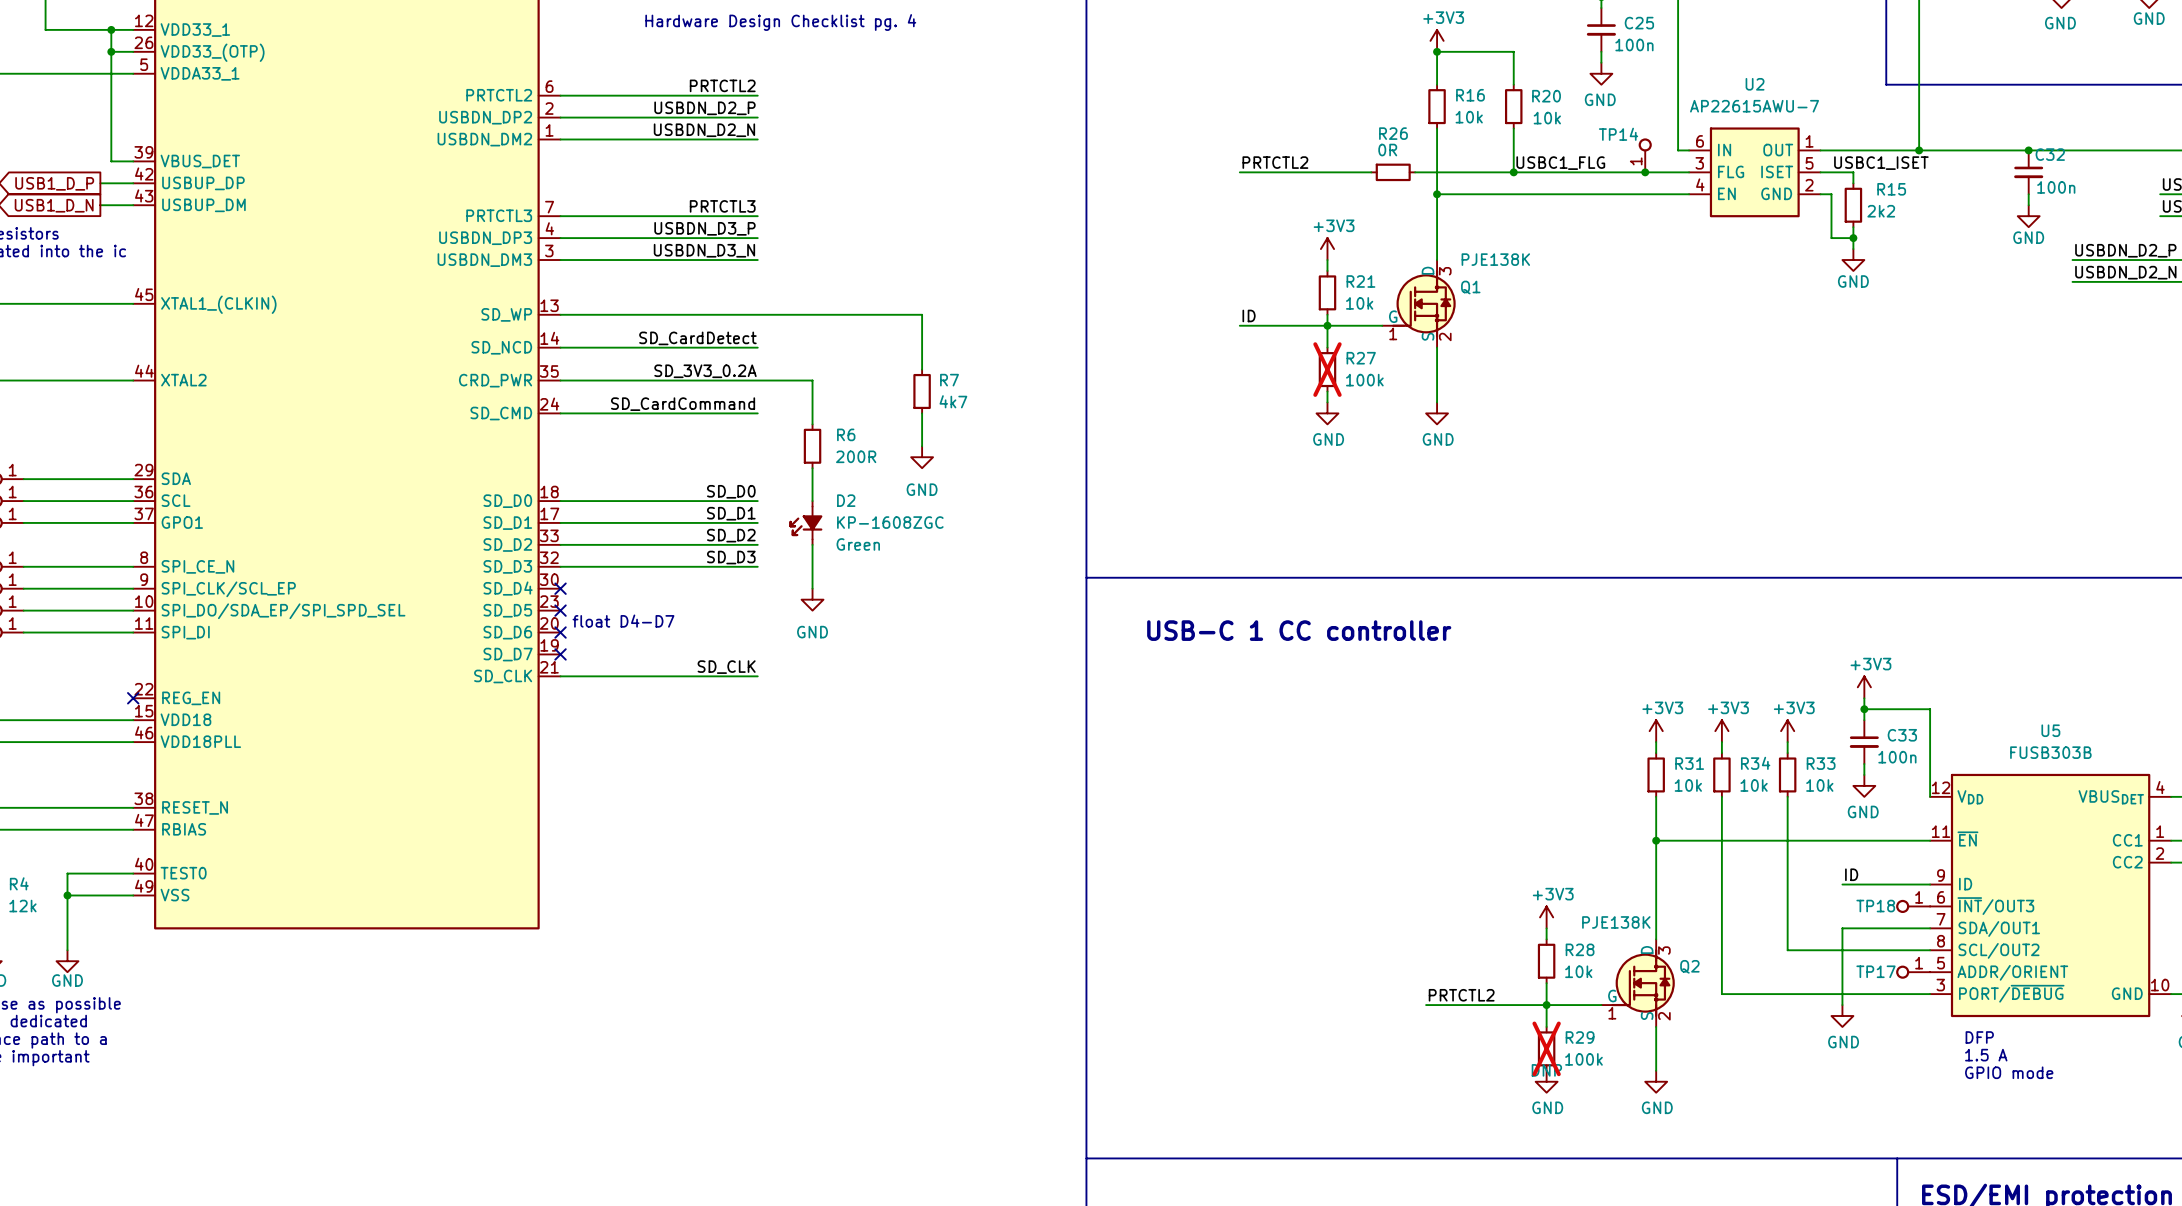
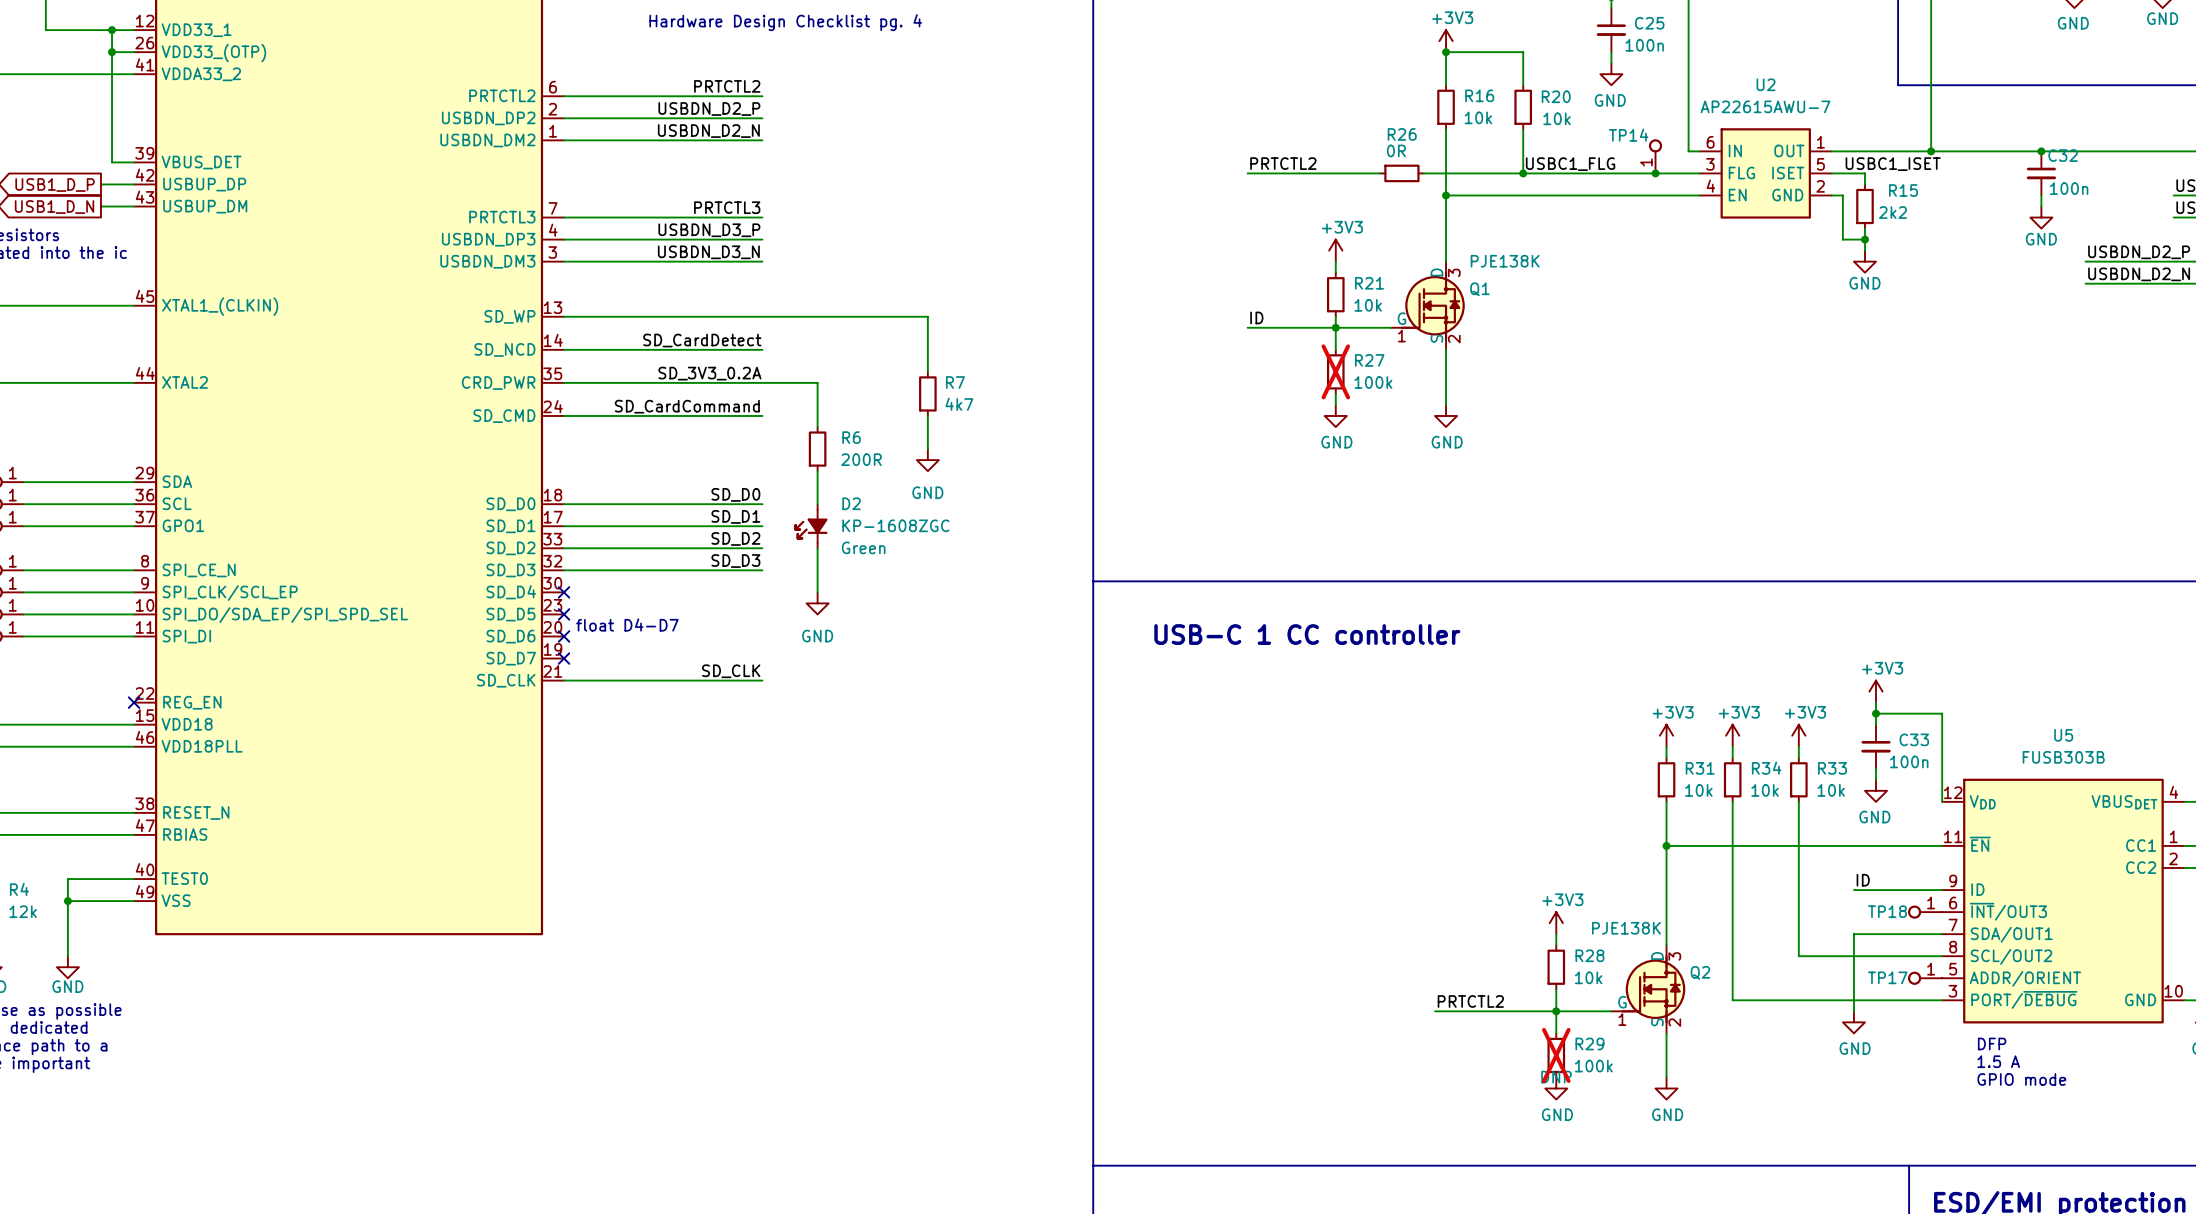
part pin number: 5 (144, 64) -> 41 (145, 64)
part pin name: VDDA33_1 (200, 73) -> VDDA33_2 (201, 74)

